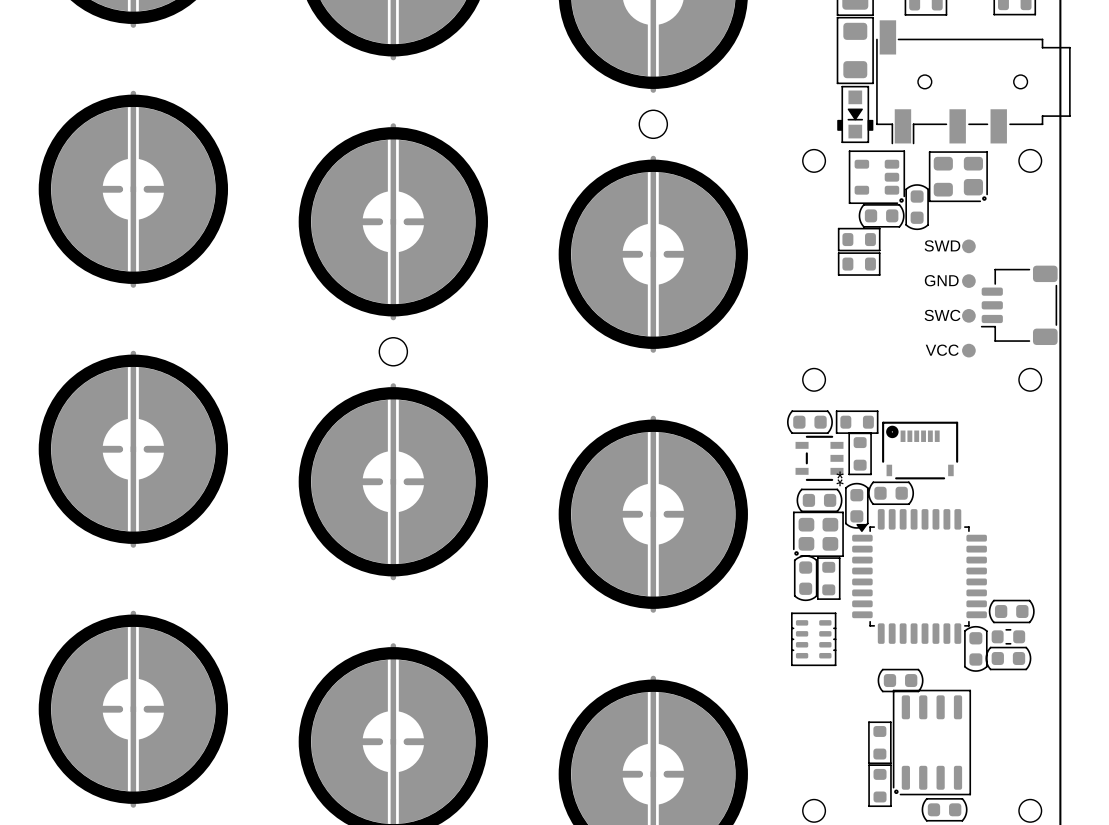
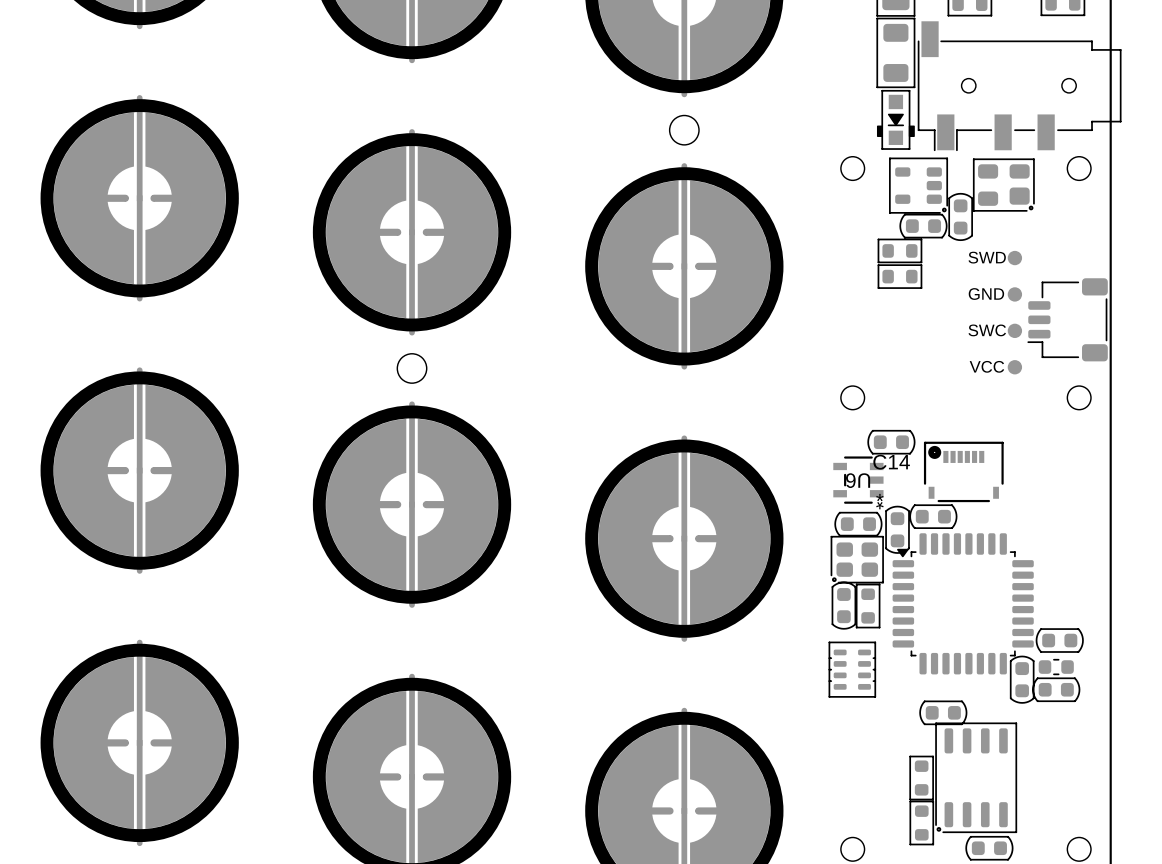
part: (809, 422) -> none
C14: none -> (891, 442)
part: (857, 422) -> none
part: (860, 453) -> none
U6 name: none -> U6 (858, 480)

